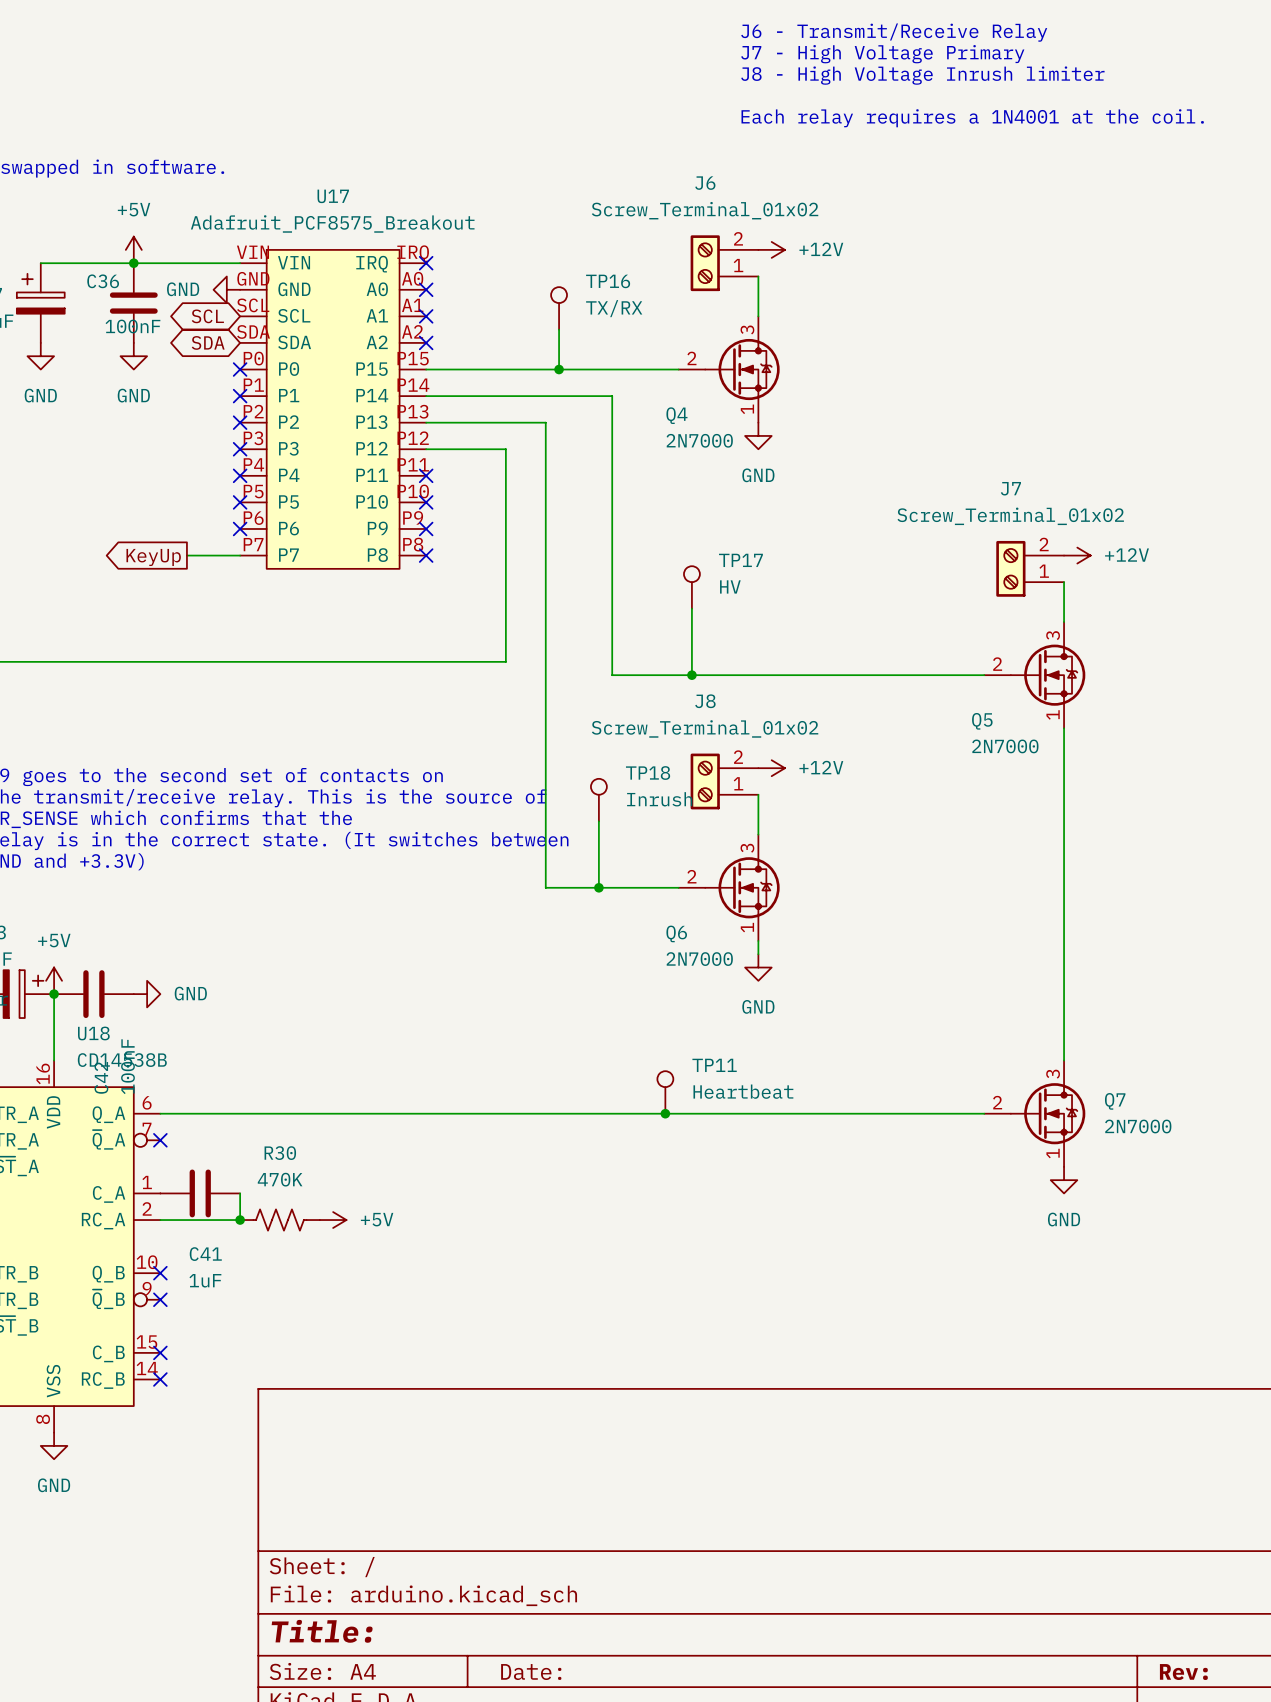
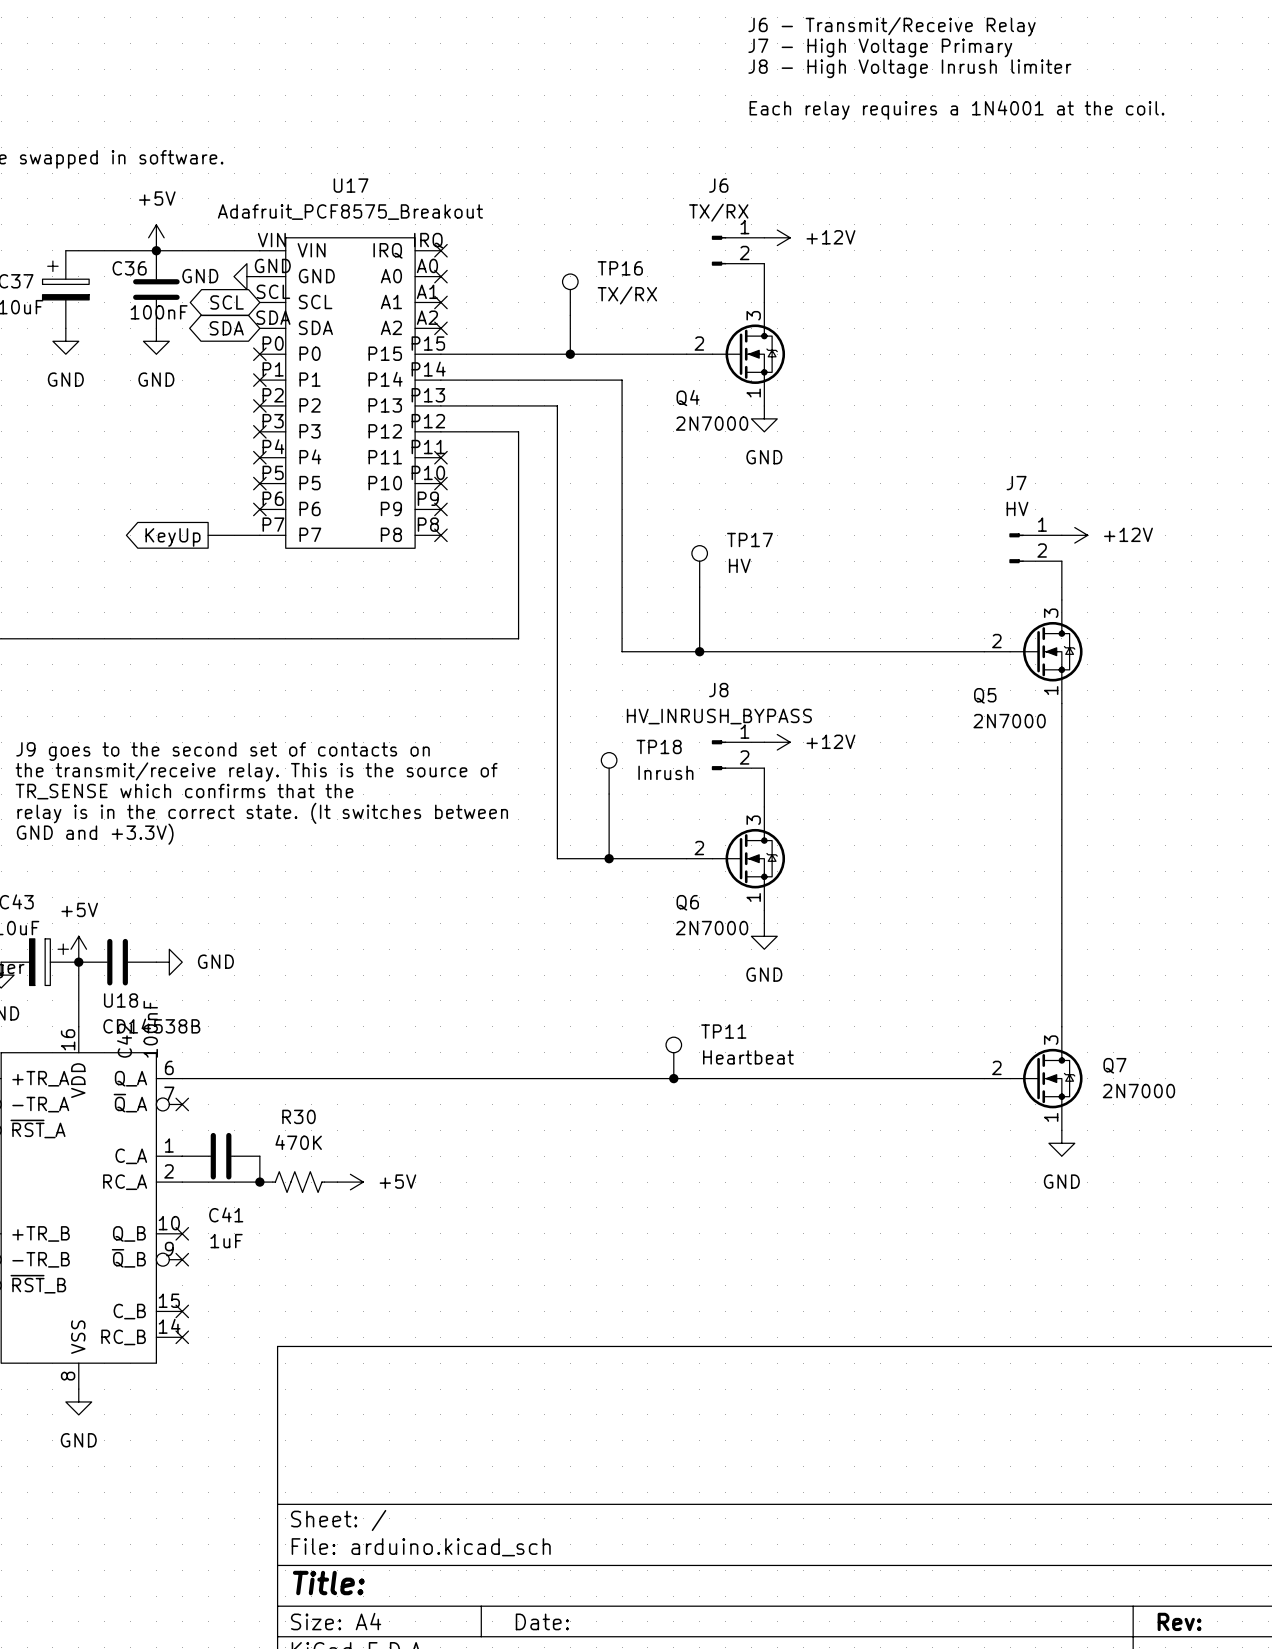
J6 value: Screw_Terminal_01x02 (705, 210) -> TX/RX (718, 212)
J6 symbol: [690, 235, 759, 292] -> [711, 235, 765, 266]
J7 value: Screw_Terminal_01x02 (1010, 516) -> HV (1017, 508)
J7 symbol: [996, 540, 1065, 597] -> [1009, 533, 1062, 564]
J8 value: Screw_Terminal_01x02 (705, 728) -> HV_INRUSH_BYPASS (719, 716)
J8 symbol: [690, 753, 759, 810] -> [711, 740, 765, 771]

